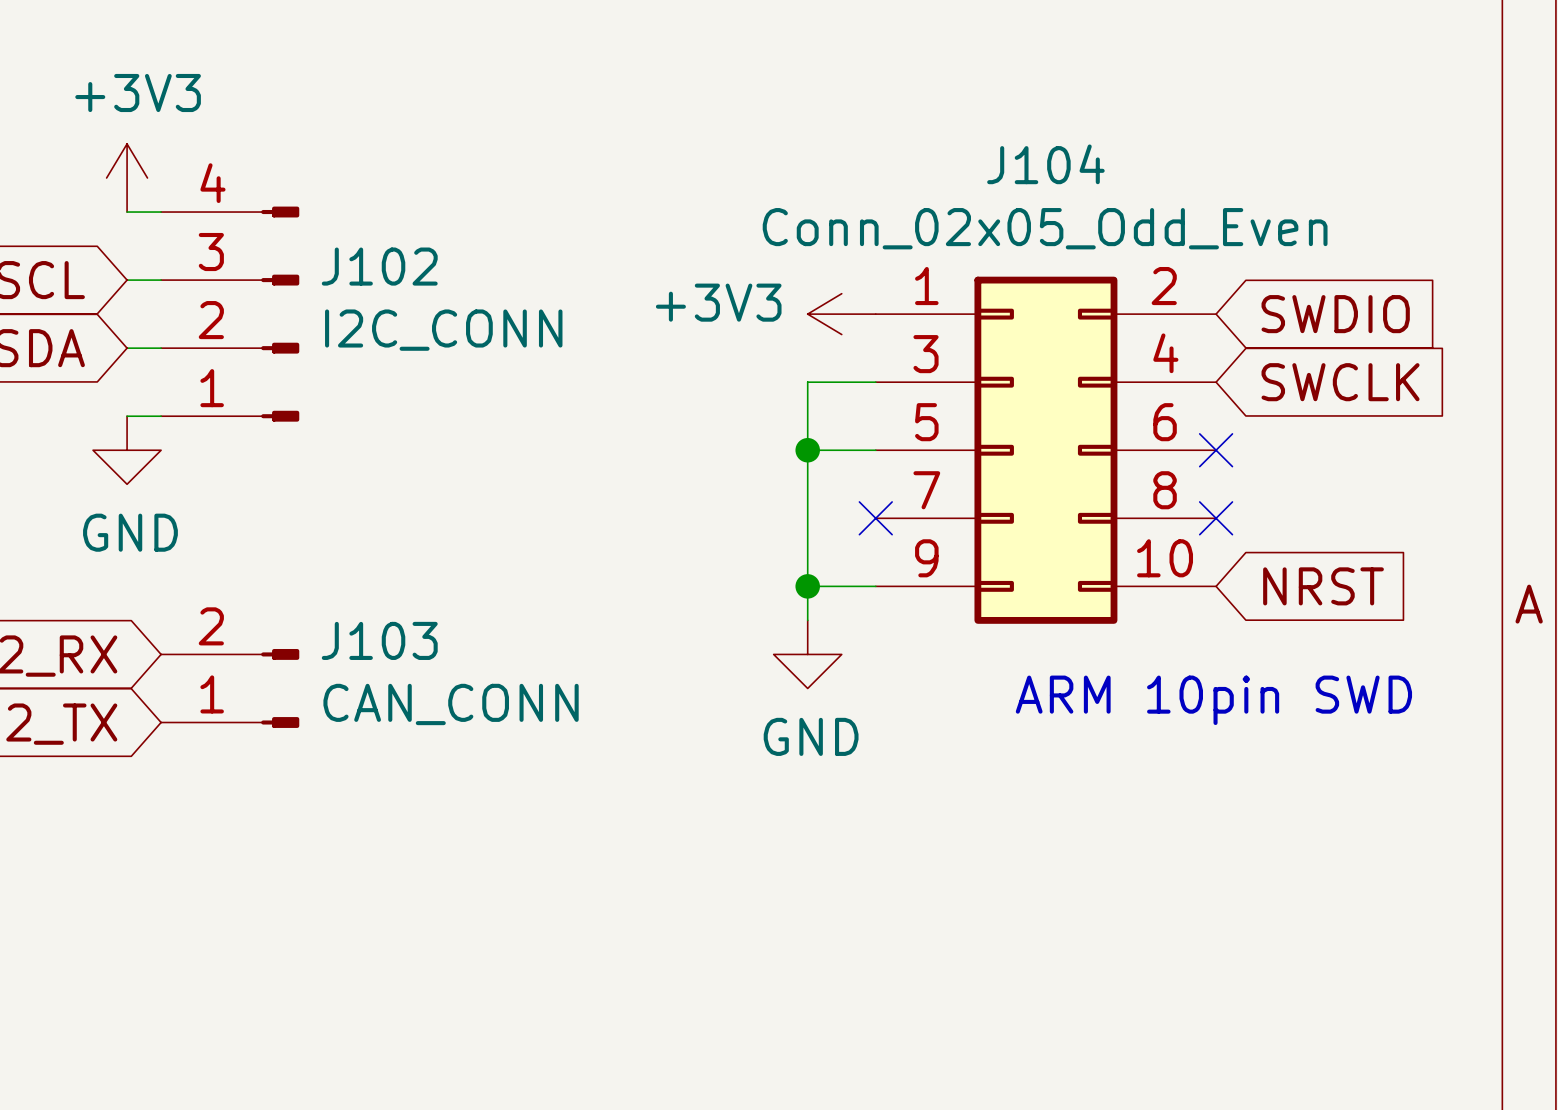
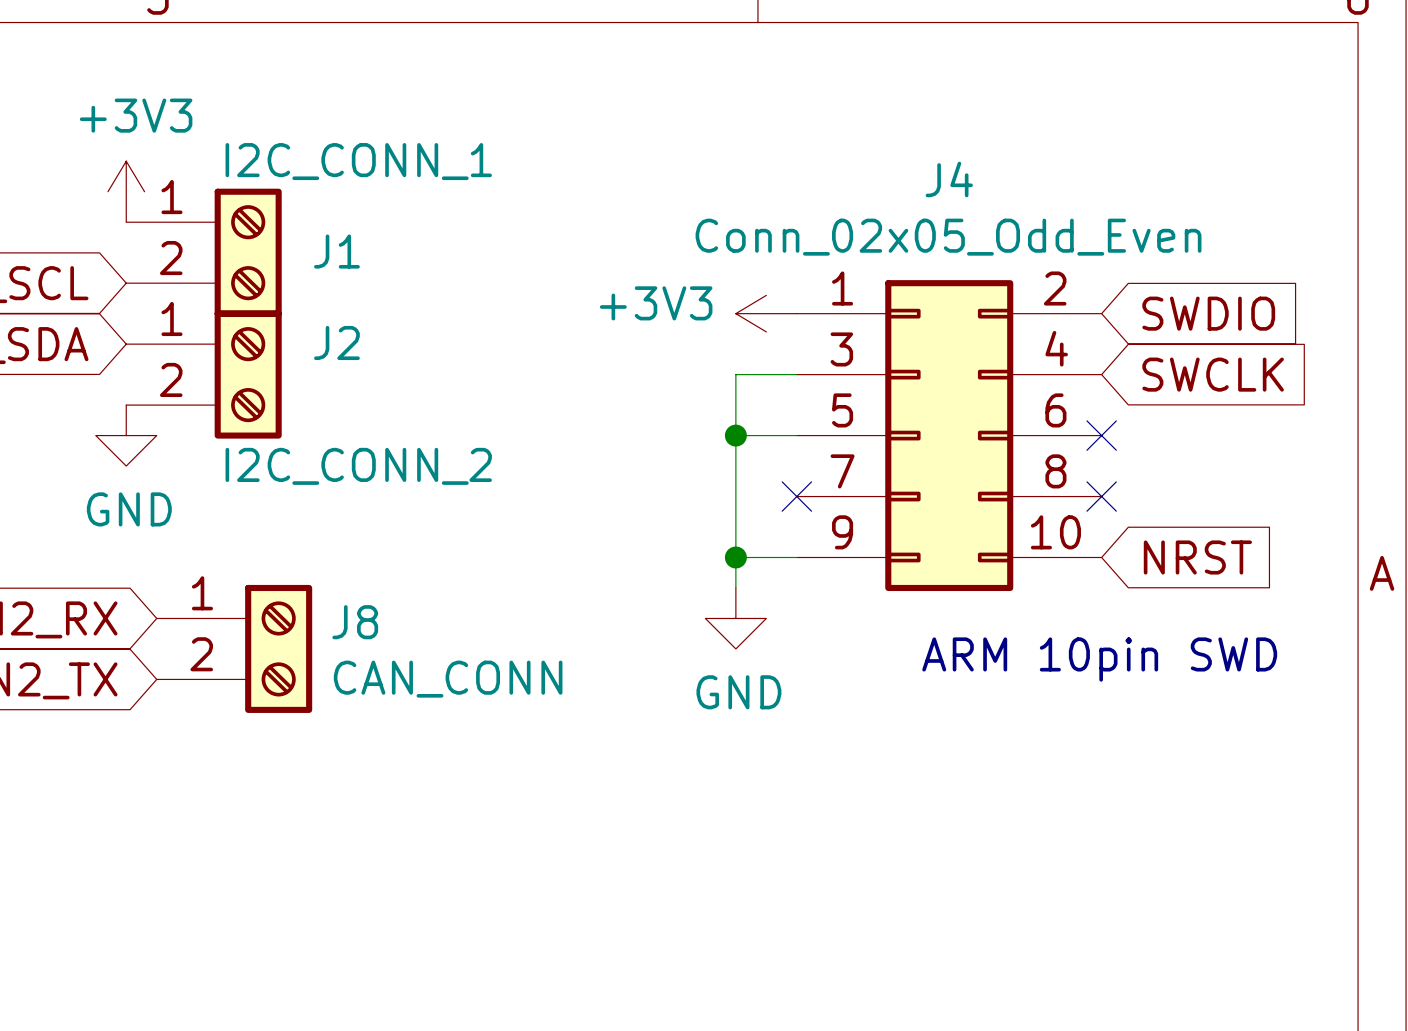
J104 name: J104 (1045, 164) -> J4 (949, 179)
J1: none -> I2C_CONN_1 (203, 252)
J102: I2C_CONN (230, 314) -> none
J2: none -> I2C_CONN_2 (203, 374)
J103: CAN_CONN (230, 688) -> none
J8: none -> CAN_CONN (234, 648)

